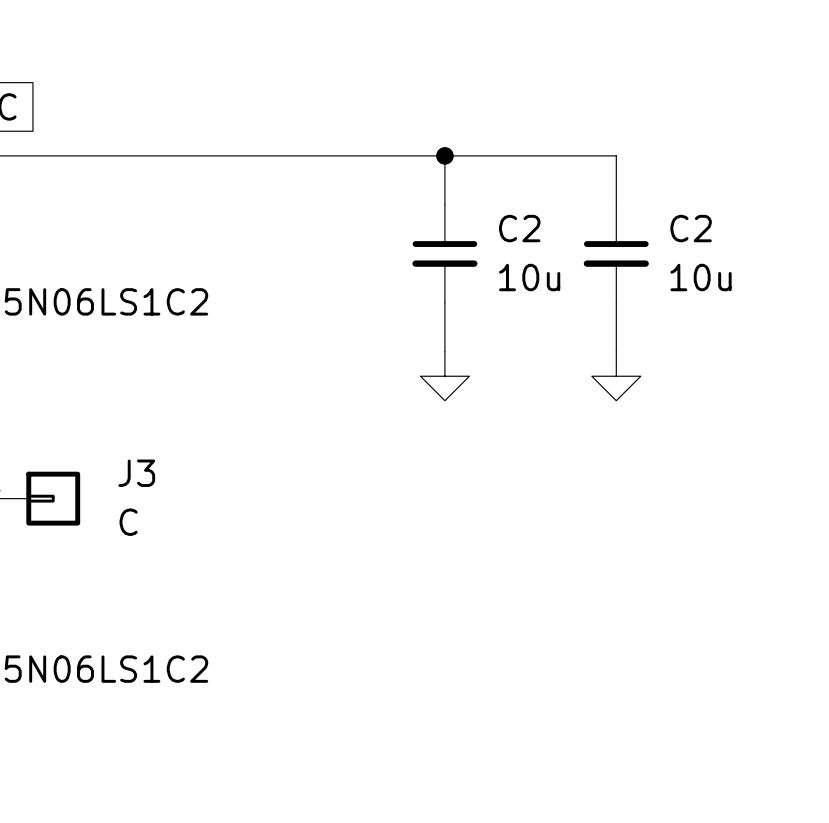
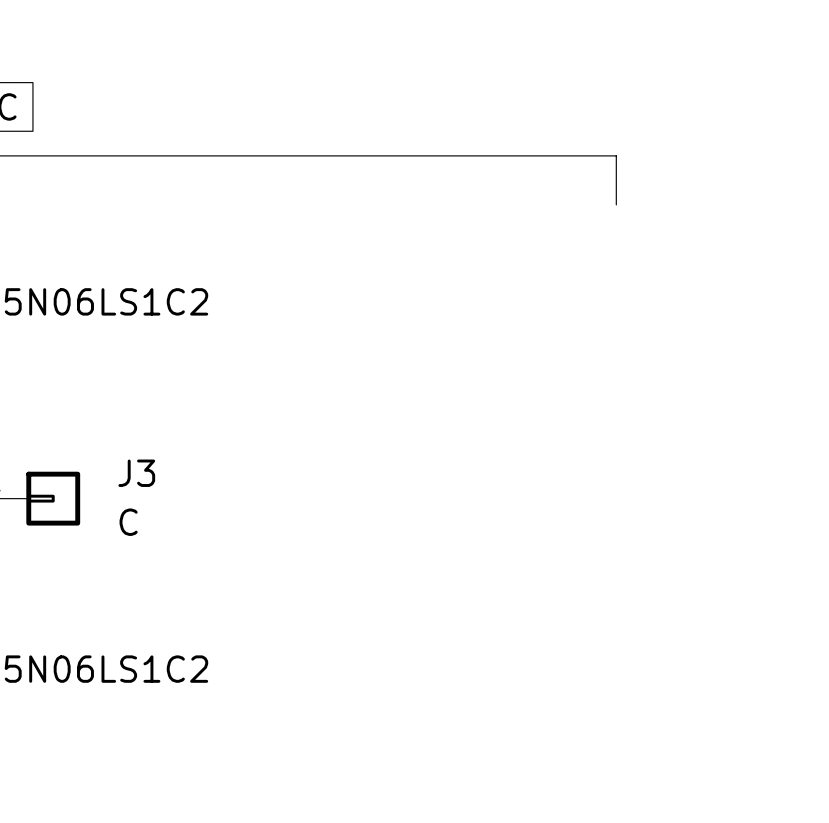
wire: (444, 155) (444, 204) -> none
junction: (444, 155) -> none
C2: 10u (444, 253) -> none
C2: 10u (616, 253) -> none
wire: (444, 302) (444, 351) -> none
wire: (616, 302) (616, 351) -> none
power symbol: (444, 376) -> none
power symbol: (616, 376) -> none

